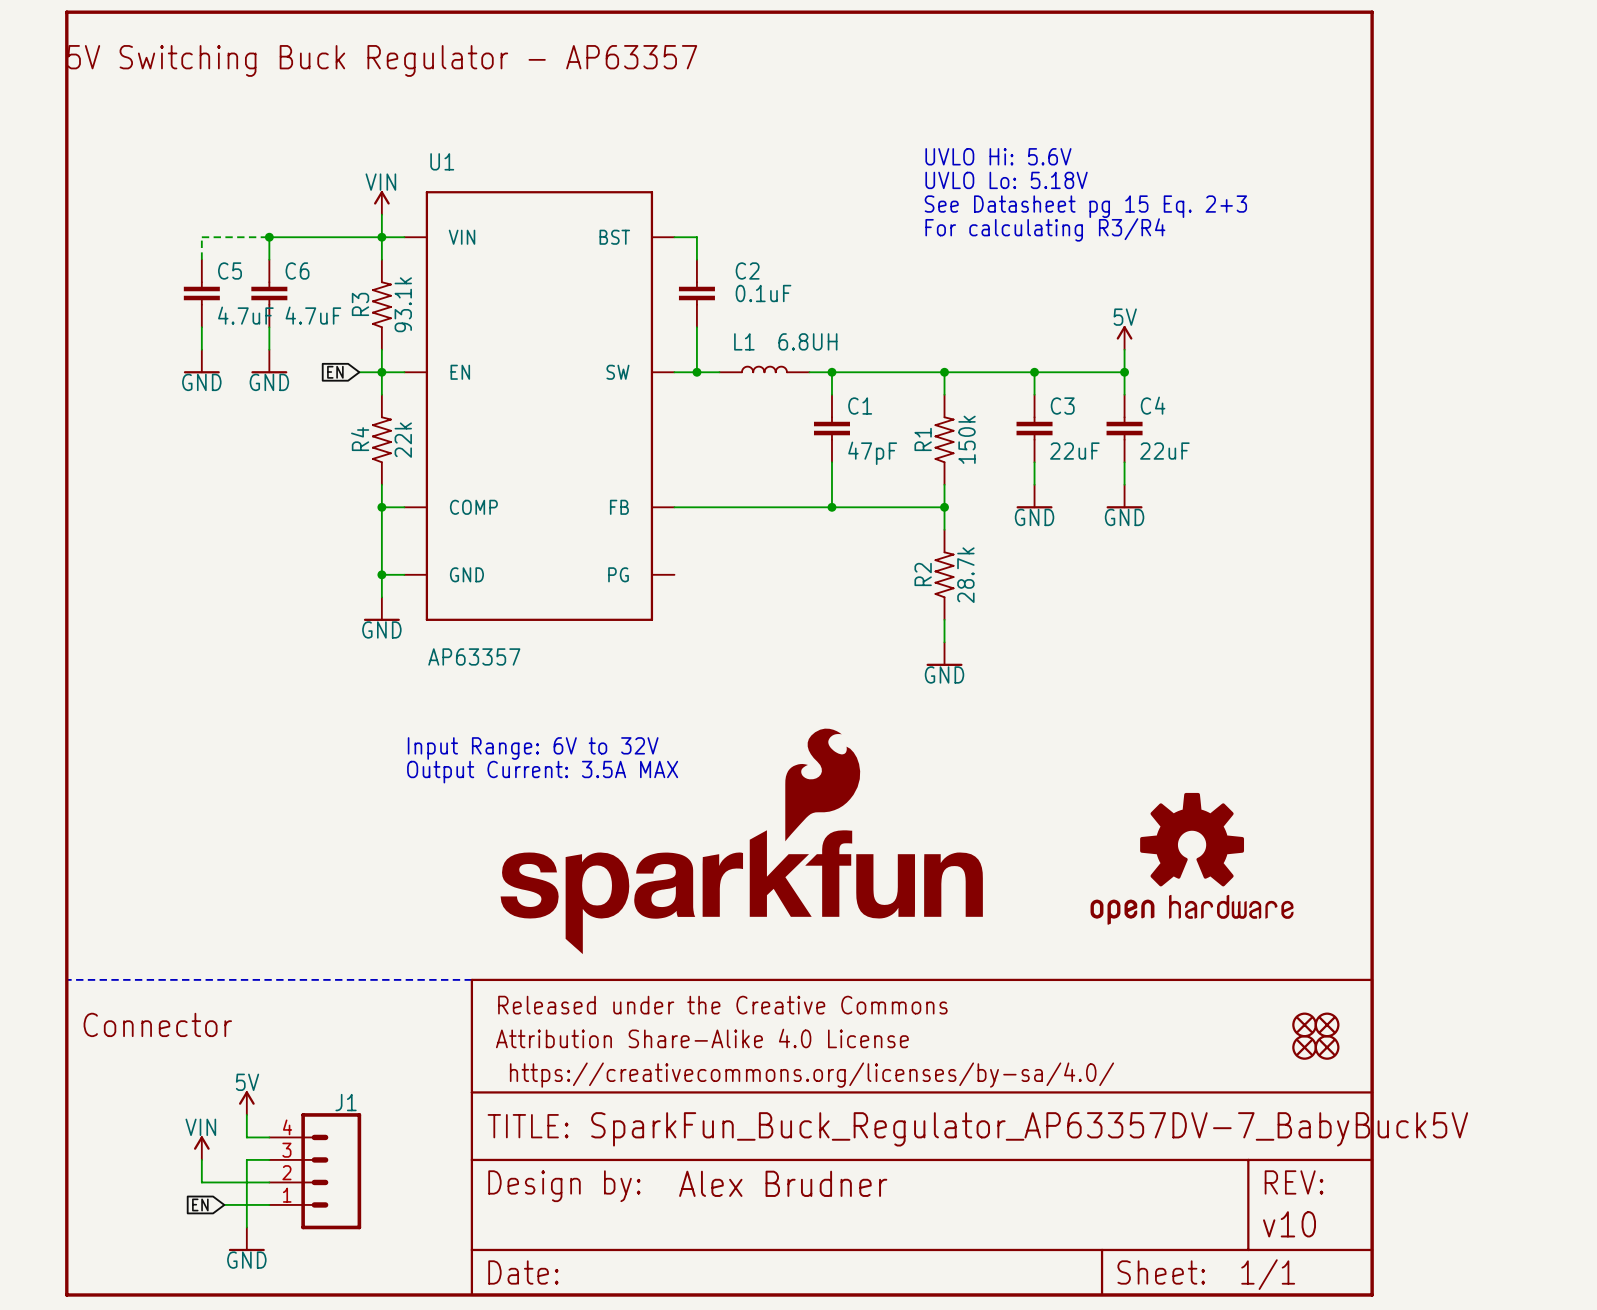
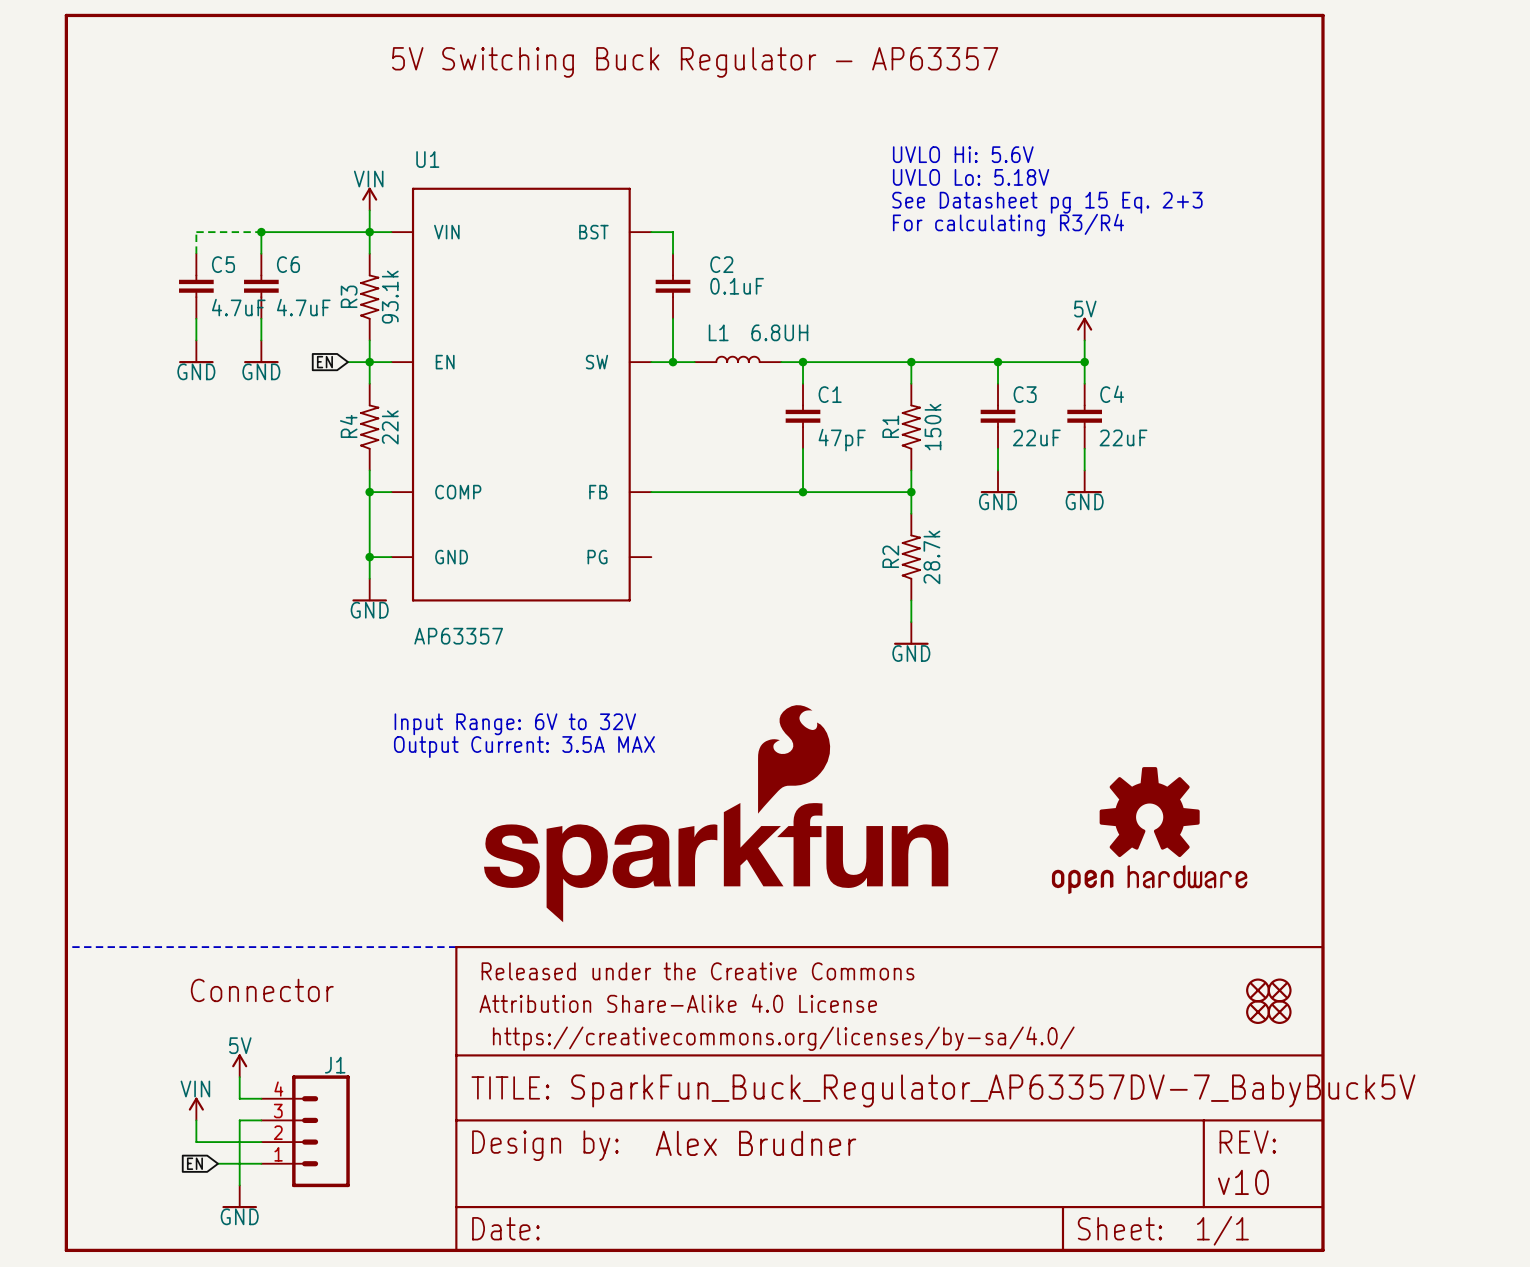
text: 5V Switching Buck Regulator - AP63357 (382, 60) -> none
text: none -> 5V Switching Buck Regulator - AP63357 (695, 62)
text position: Connector (157, 1024) -> Connector (262, 990)

